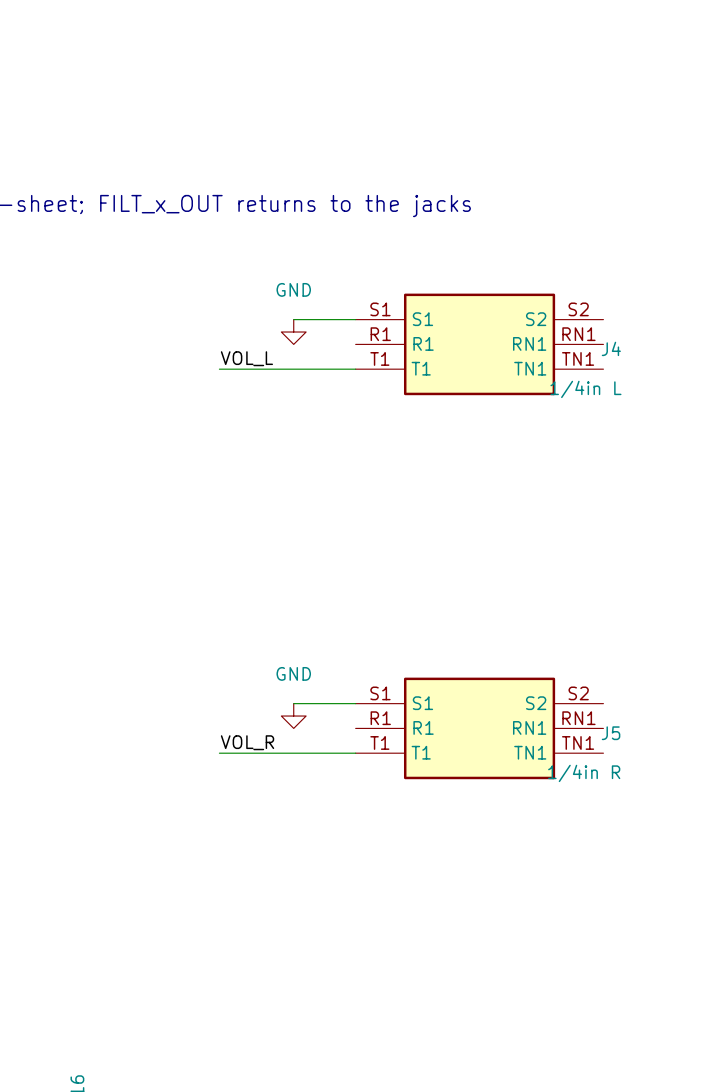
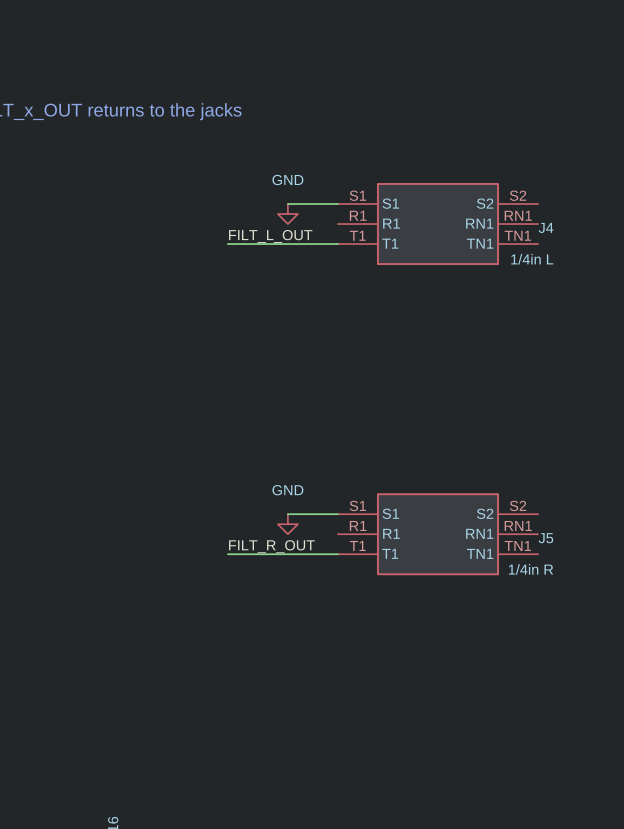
label: VOL_L (246, 358) -> FILT_L_OUT (270, 236)
label: VOL_R (247, 742) -> FILT_R_OUT (271, 546)

